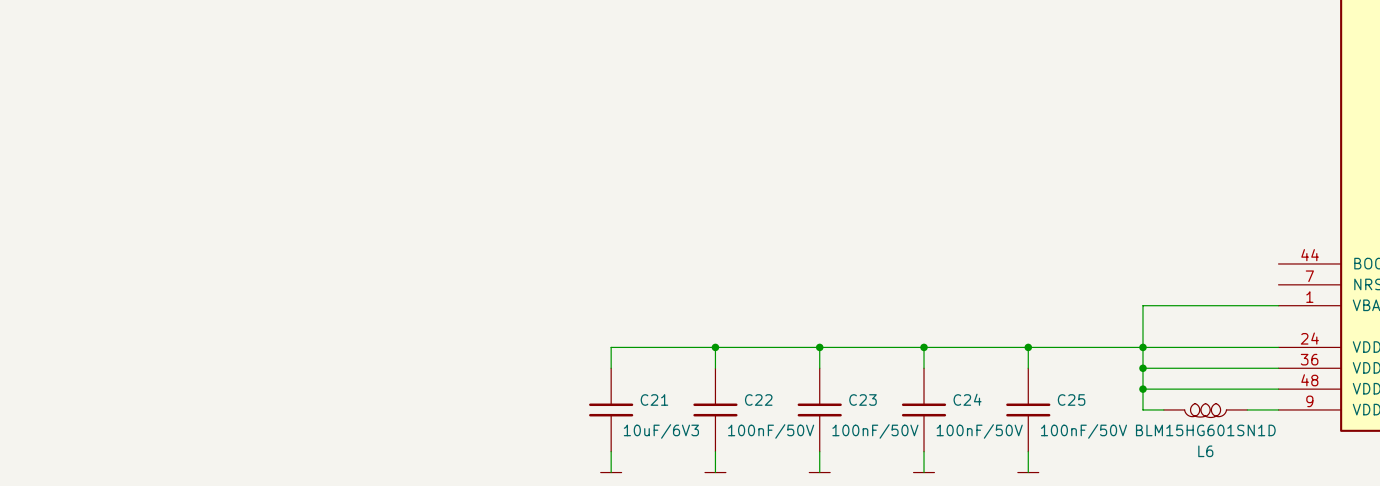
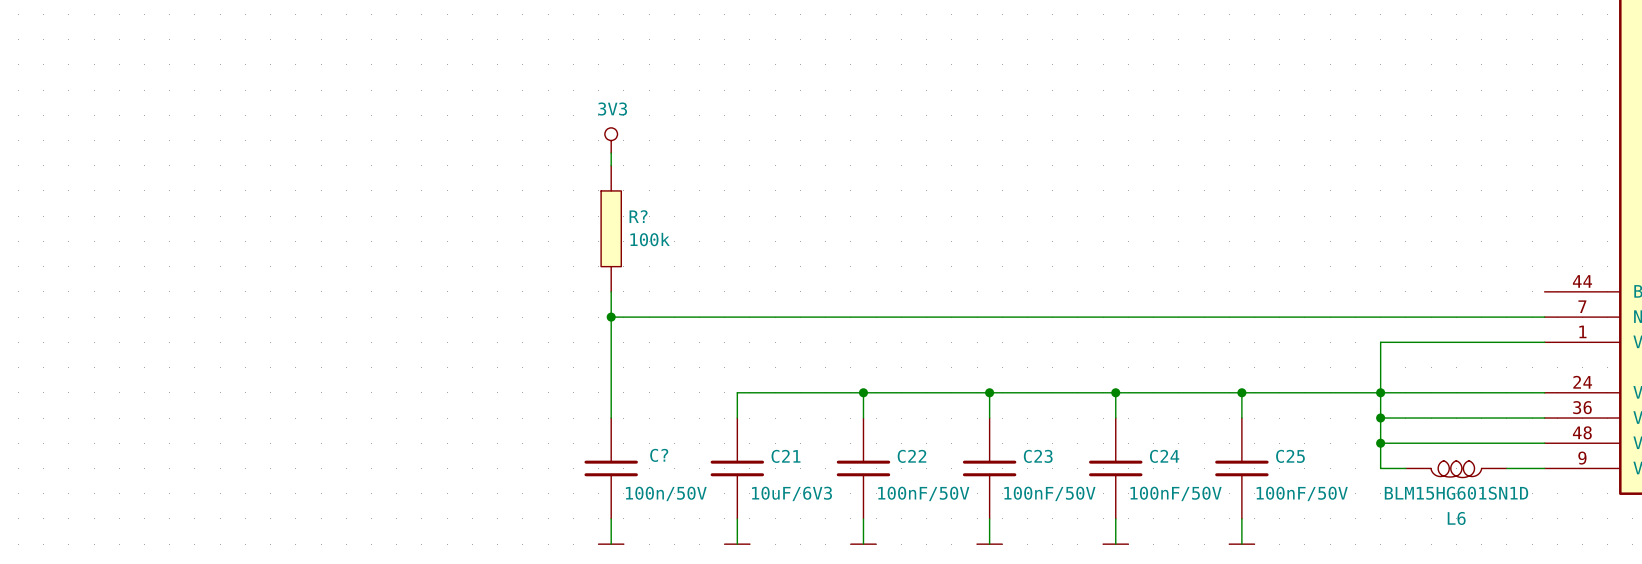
power symbol: none -> 3V3 (611, 140)
wire: none -> (611, 153) (611, 165)
R?: none -> 100k (611, 228)
wire: none -> (611, 291) (611, 418)
wire: none -> (611, 317) (1544, 317)
junction: none -> (611, 317)
C?: none -> 100n/50V (611, 468)
wire: none -> (611, 518) (611, 544)
power symbol: none -> (611, 544)

